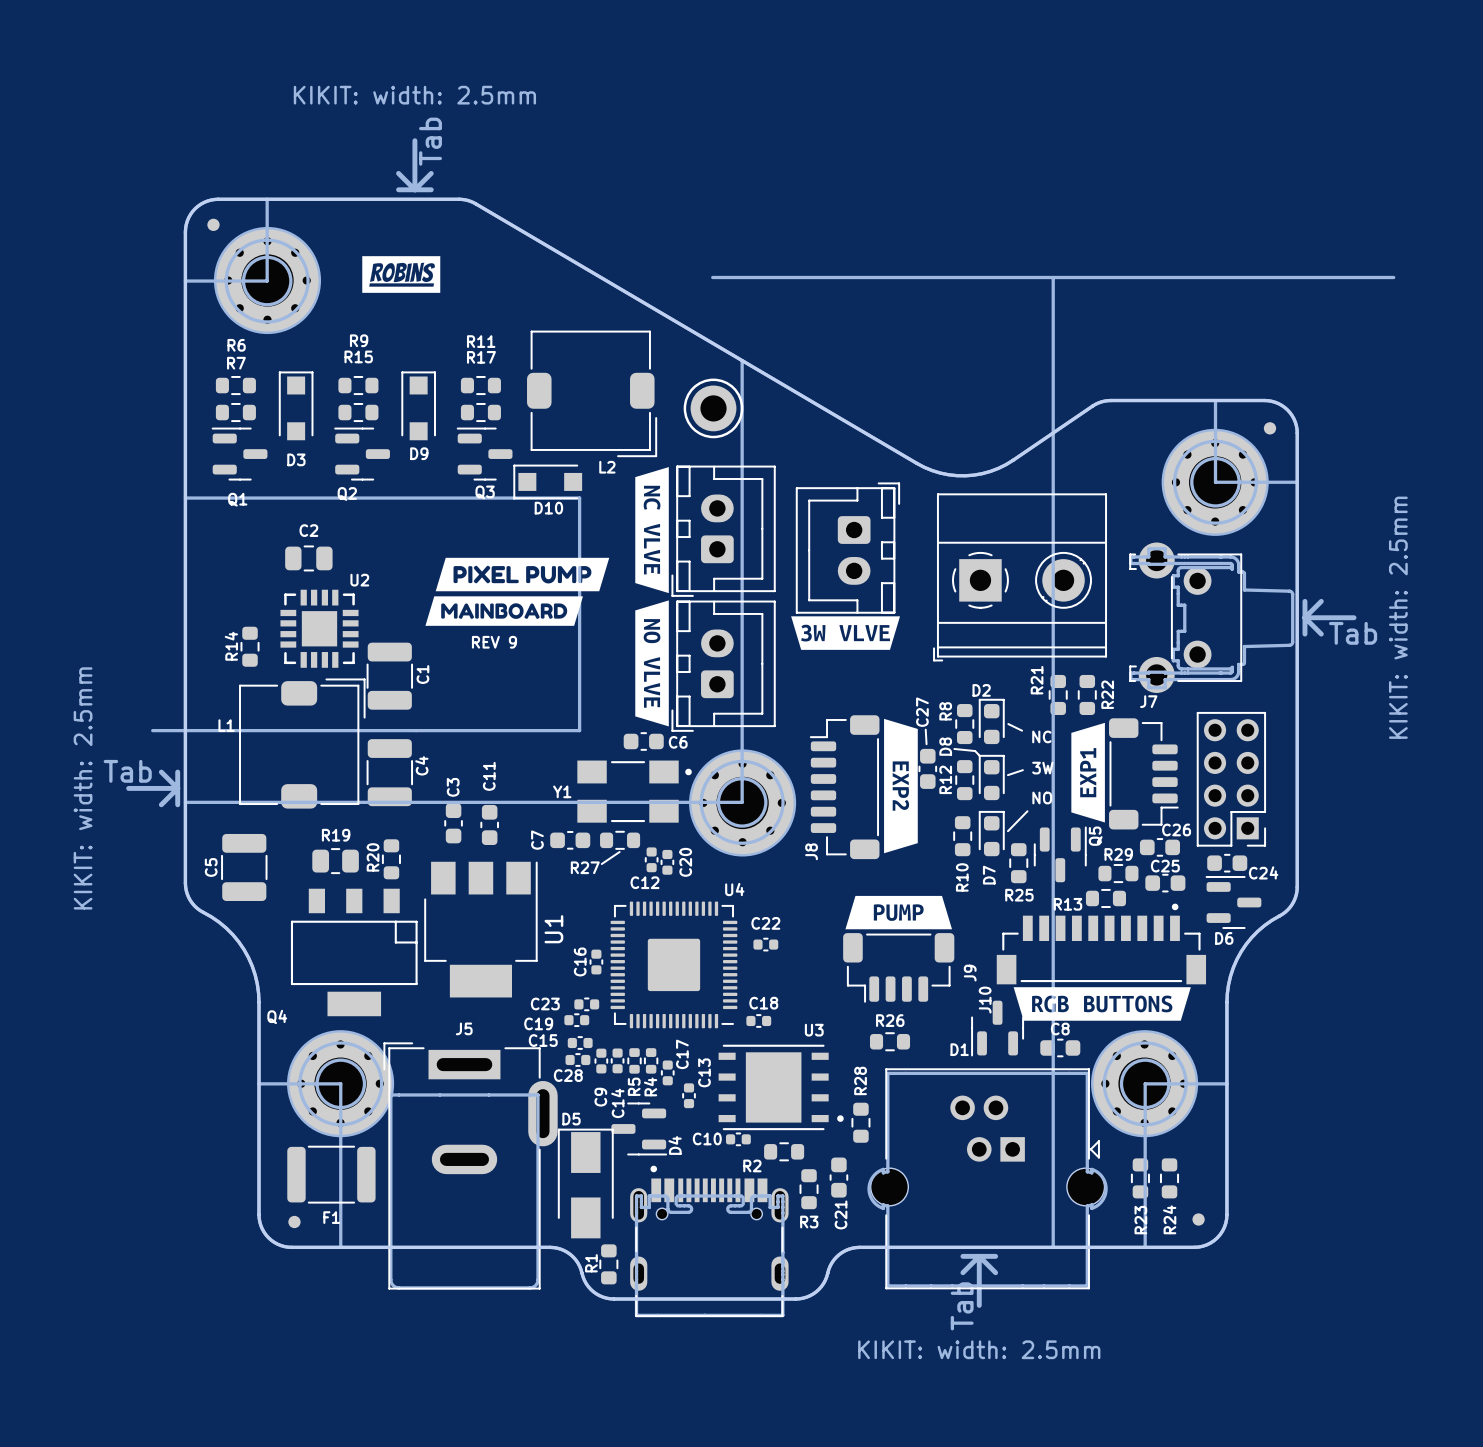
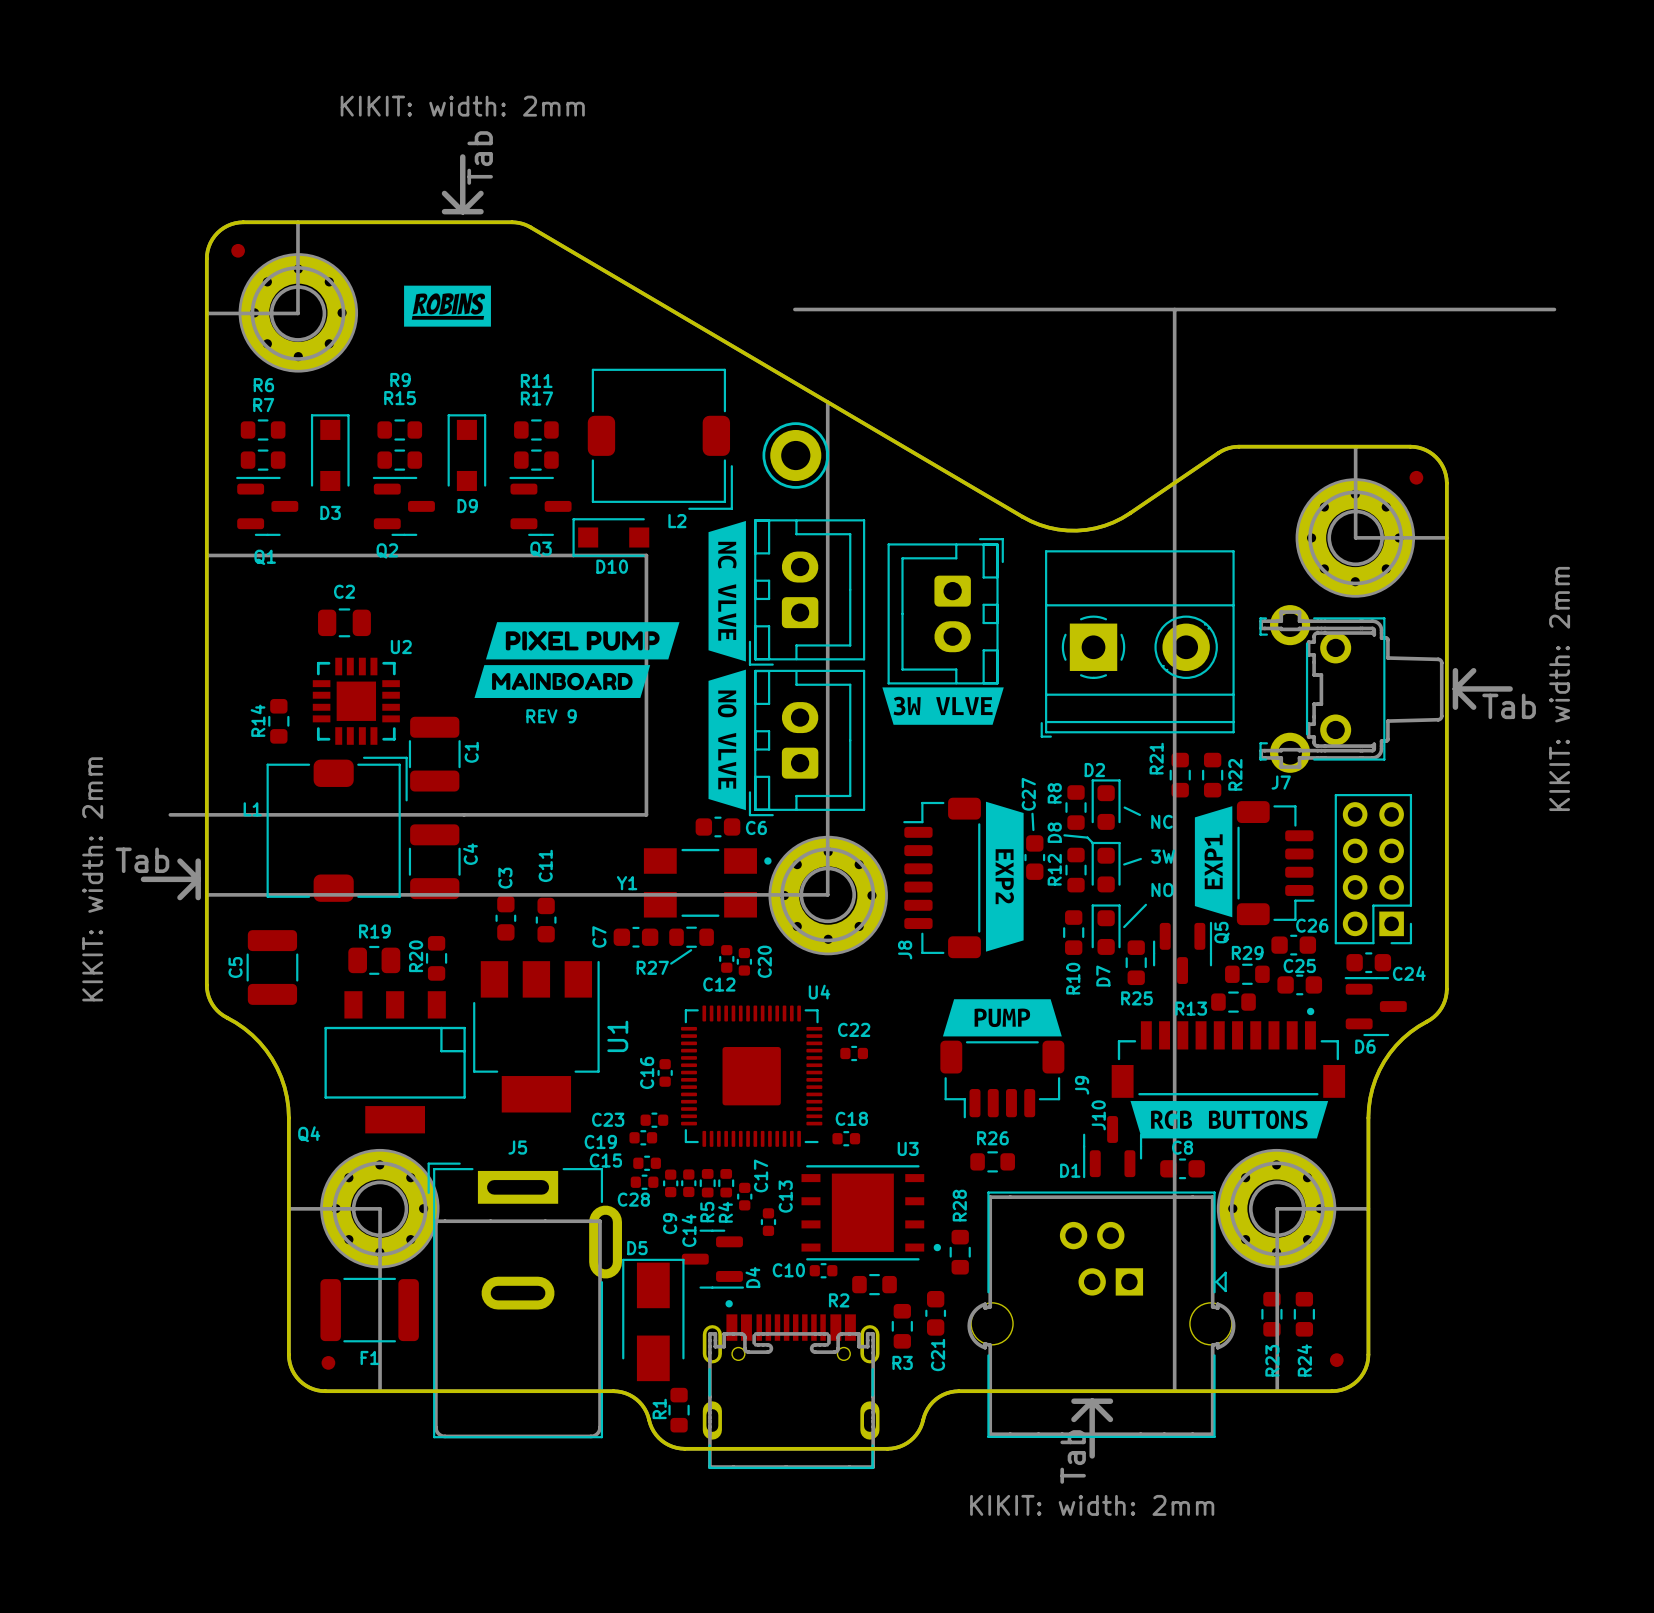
drawing shape: [293, 85, 537, 193] -> [340, 95, 585, 215]
drawing shape: [1302, 496, 1408, 739] -> [1452, 566, 1571, 812]
drawing shape: [73, 667, 181, 910] -> [82, 757, 201, 1002]
drawing shape: [858, 1253, 1101, 1360] -> [970, 1398, 1215, 1516]

